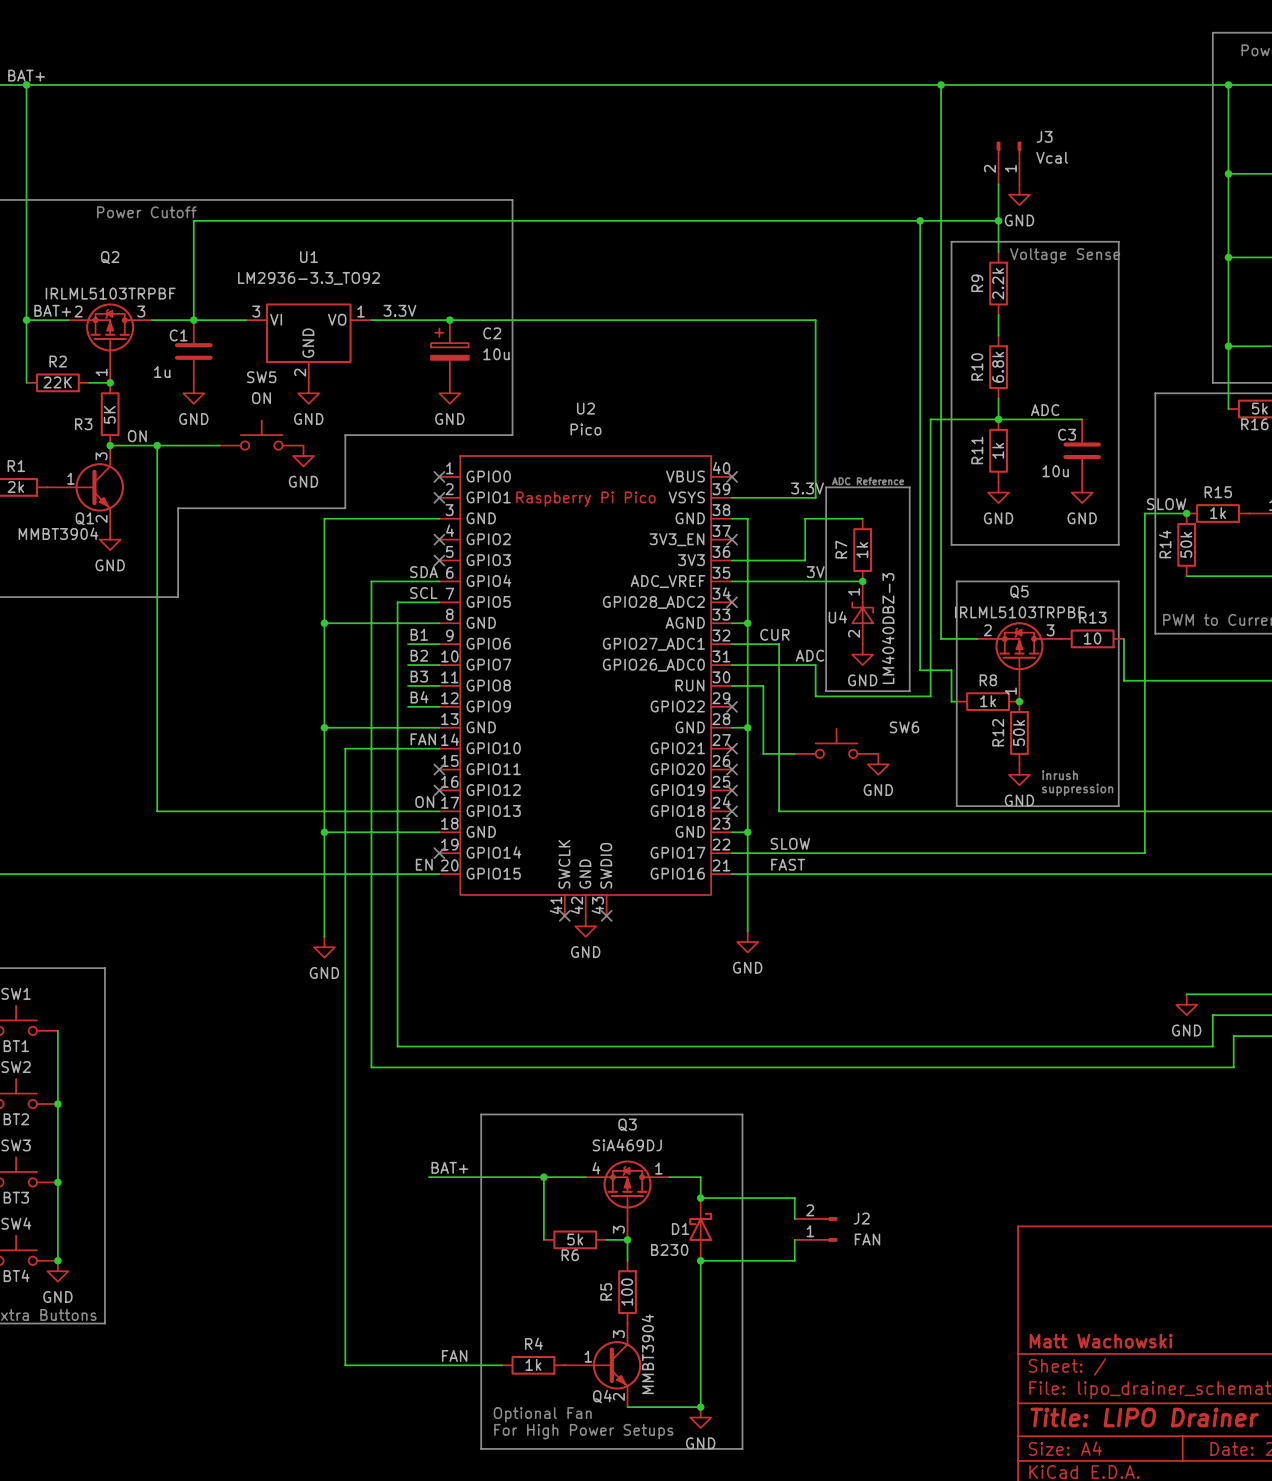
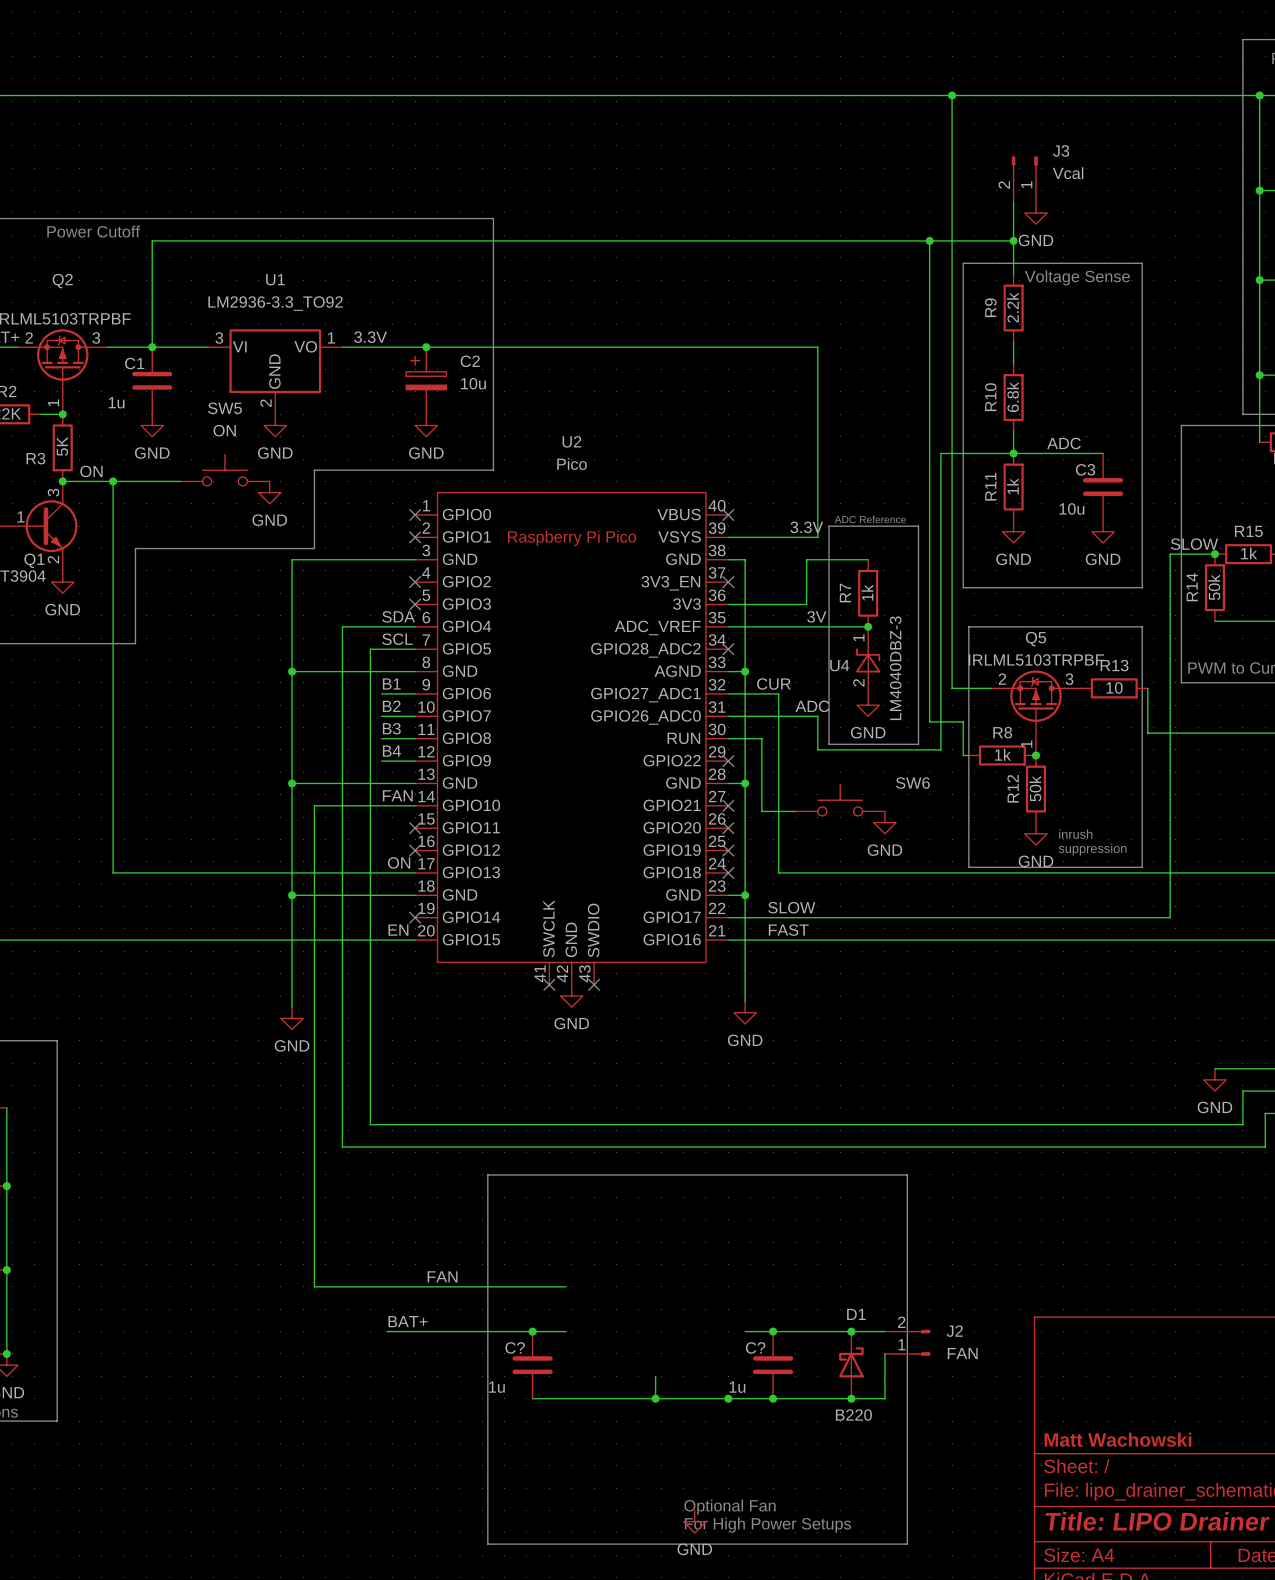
line: (481, 1114) (742, 1114) (742, 1448) (481, 1448) (481, 1114) -> (487, 1174) (487, 1544) (907, 1544) (907, 1174) (487, 1174)
label position: BAT+ (449, 1167) -> BAT+ (407, 1321)
wire: (428, 1177) (585, 1177) -> none
wire: (543, 1177) (543, 1239) -> none
junction: (543, 1177) -> none
wire: (669, 1177) (700, 1177) (700, 1198) (794, 1198) (794, 1218) -> none
wire: (345, 1198) (345, 1365) (502, 1365) -> (314, 1286) (566, 1286)
junction: (700, 1198) -> none
Q3: SiA469DJ (627, 1200) -> none
D1 name position: D1 (680, 1229) -> D1 (856, 1314)
D1 position: (700, 1229) -> (851, 1365)
J2 position: (815, 1229) -> (907, 1342)
wire: none -> (387, 1331) (566, 1331)
junction: none -> (532, 1331)
R6: 5k (575, 1239) -> none
wire: (606, 1239) (627, 1239) (627, 1260) -> none
junction: (627, 1239) -> none
wire: none -> (745, 1331) (884, 1331)
junction: none -> (773, 1331)
wire: (794, 1239) (794, 1260) (700, 1260) (700, 1407) (627, 1407) -> none
junction: none -> (851, 1331)
D1 value: B230 (669, 1249) -> B220 (853, 1415)
junction: (700, 1260) -> none
wire: none -> (884, 1353) (884, 1398) (532, 1398)
C?: none -> 1u (532, 1365)
C?: none -> 1u (773, 1365)
wire: none -> (655, 1376) (655, 1398)
R5: 100 (627, 1292) -> none
junction: none -> (655, 1398)
junction: none -> (728, 1398)
junction: none -> (773, 1398)
junction: none -> (851, 1398)
label position: FAN (454, 1355) -> FAN (442, 1276)
R4: 1k (533, 1365) -> none
Q4: MMBT3904 (603, 1365) -> none
junction: (700, 1407) -> none
text position: Optional Fan (542, 1414) -> Optional Fan (730, 1507)
text position: For High Power Setups (583, 1431) -> For High Power Setups (768, 1525)

